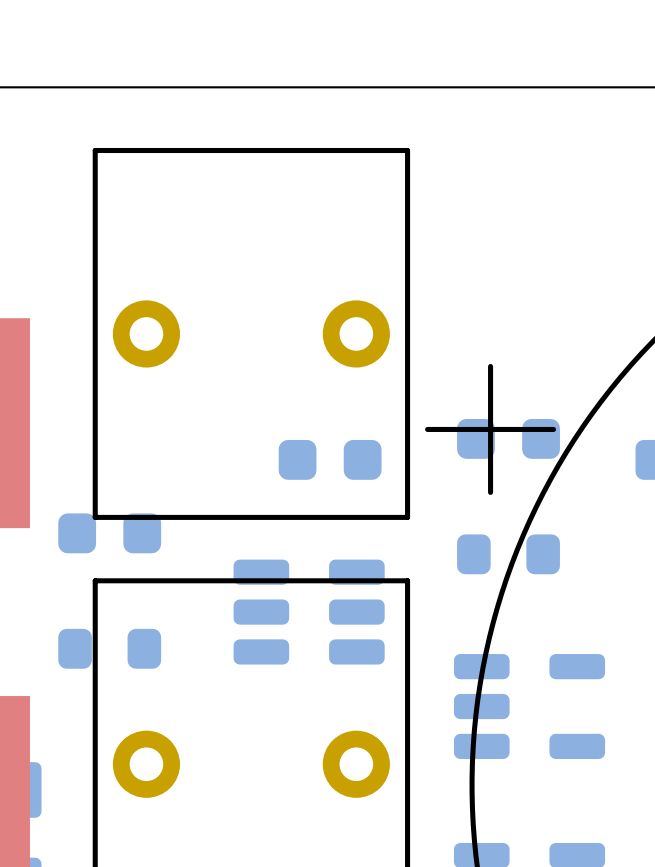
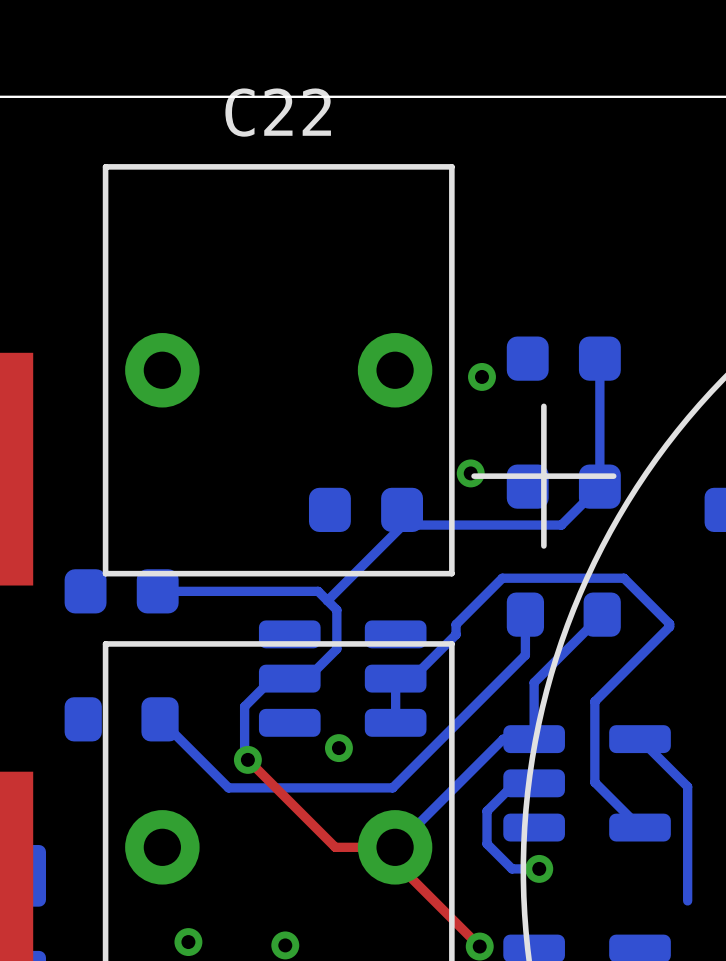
C22 name: none -> C22 (278, 112)
part: none -> (563, 358)
bottom track: none -> (599, 358) (599, 486) (561, 525) (417, 525) (410, 518)
via: none -> (481, 376)
via: none -> (470, 473)
bottom track: none -> (410, 518) (327, 600)
bottom track: none -> (157, 591) (318, 591) (327, 600)
bottom track: none -> (327, 600) (336, 610) (336, 649) (307, 678) (272, 678) (244, 706) (244, 756) (247, 759)
bottom track: none -> (525, 614) (525, 655) (392, 787) (228, 787) (160, 719)
bottom track: none -> (602, 614) (534, 682) (534, 739) (503, 739) (395, 847)
bottom track: none -> (395, 722) (395, 678) (412, 678) (456, 634) (456, 624) (502, 578) (623, 578) (669, 623) (669, 626) (594, 701) (594, 782) (640, 827)
bottom track: none -> (640, 739) (687, 786) (687, 900)
via: none -> (338, 748)
top track: none -> (247, 759) (335, 847) (395, 847) (395, 861) (479, 946)
via: none -> (247, 759)
bottom track: none -> (534, 783) (514, 783) (487, 811) (487, 843) (512, 868) (539, 868)
via: none -> (539, 868)
via: none -> (188, 942)
via: none -> (285, 945)
via: none -> (479, 946)

